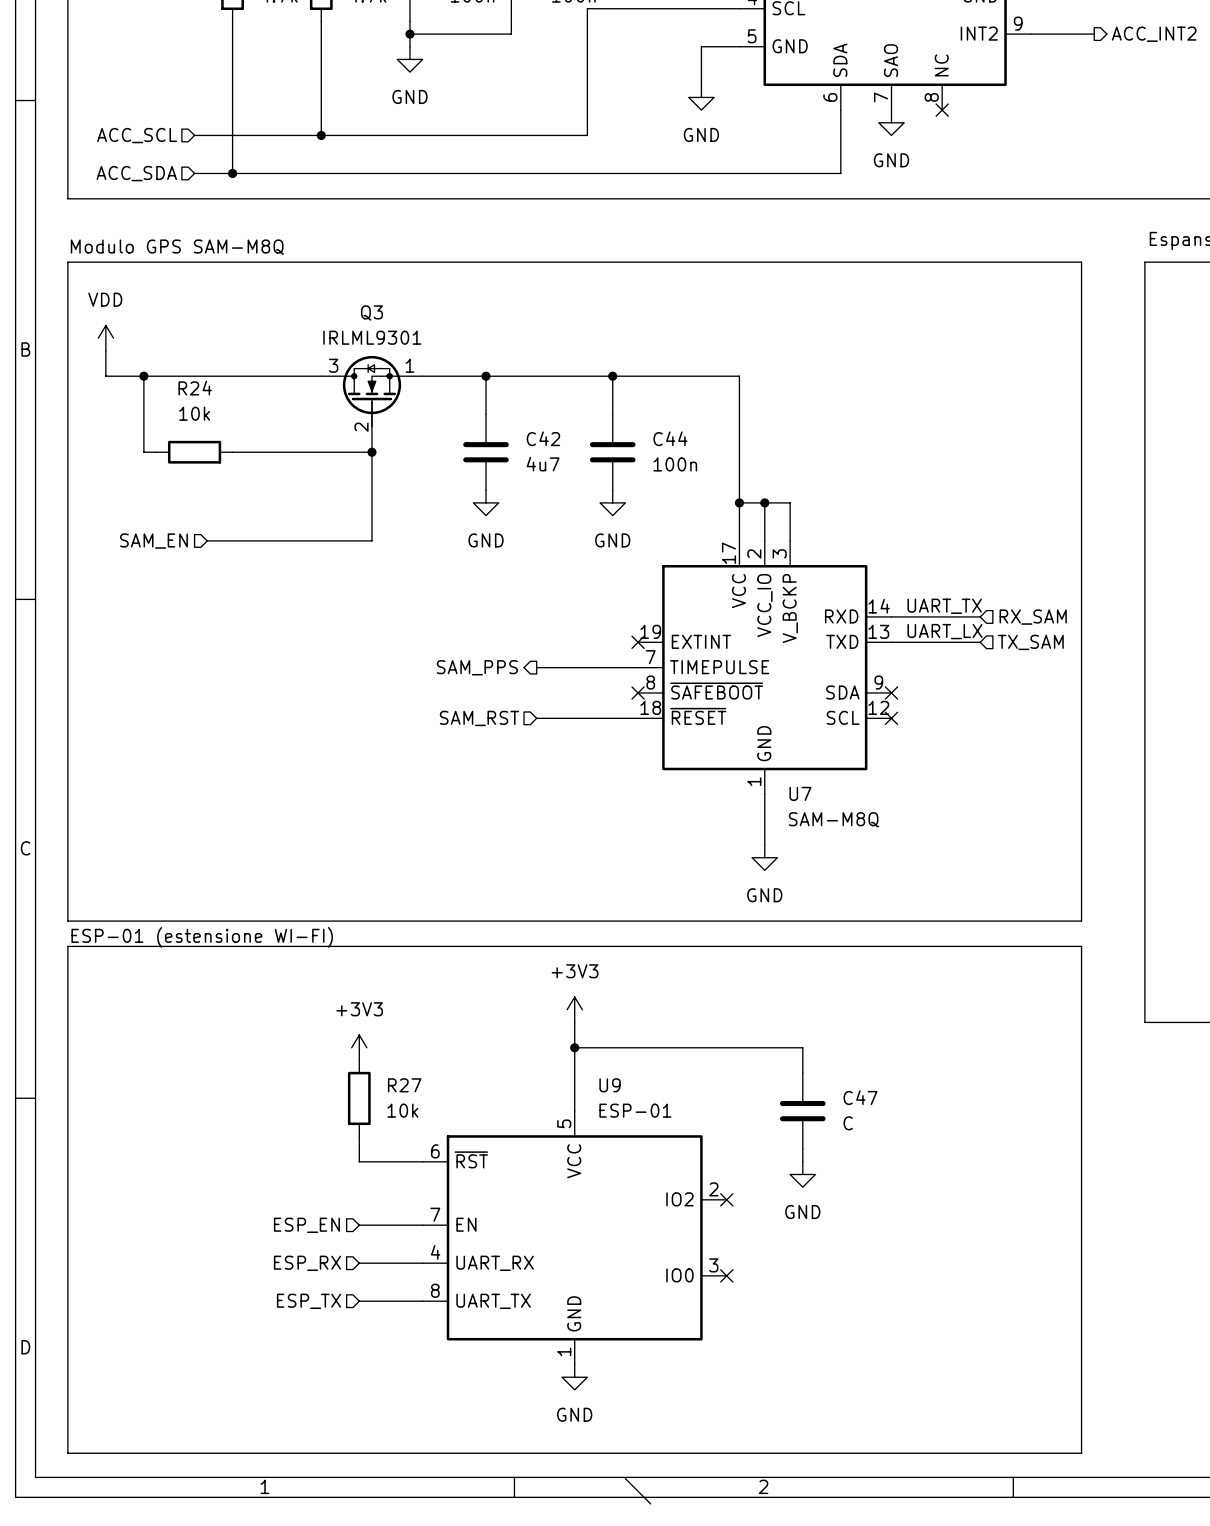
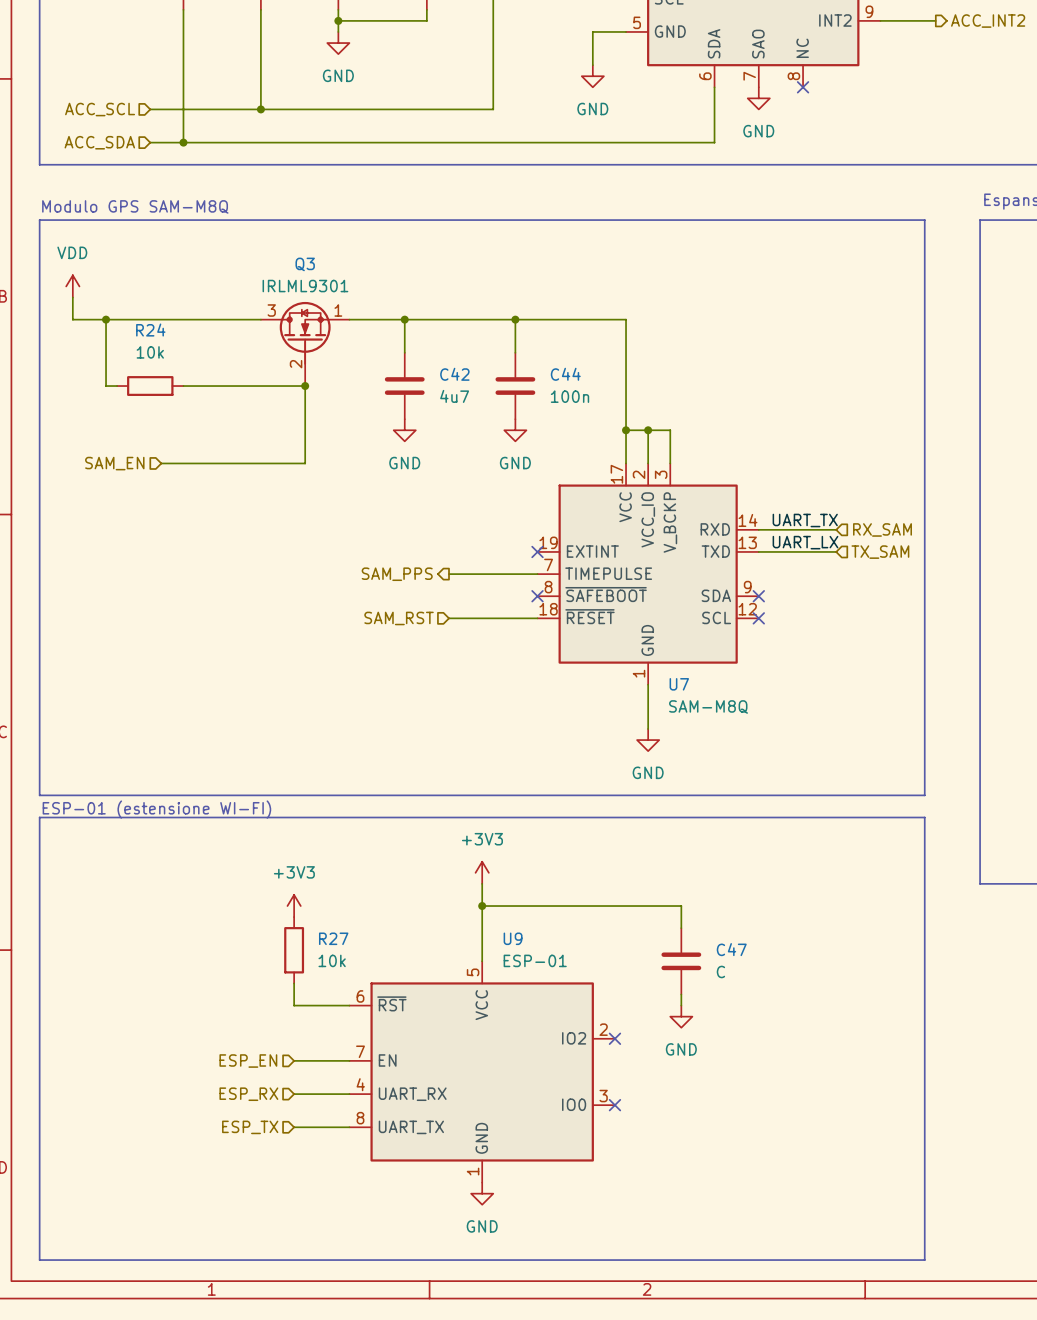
wire: (625, 1478) (650, 1503) -> none

